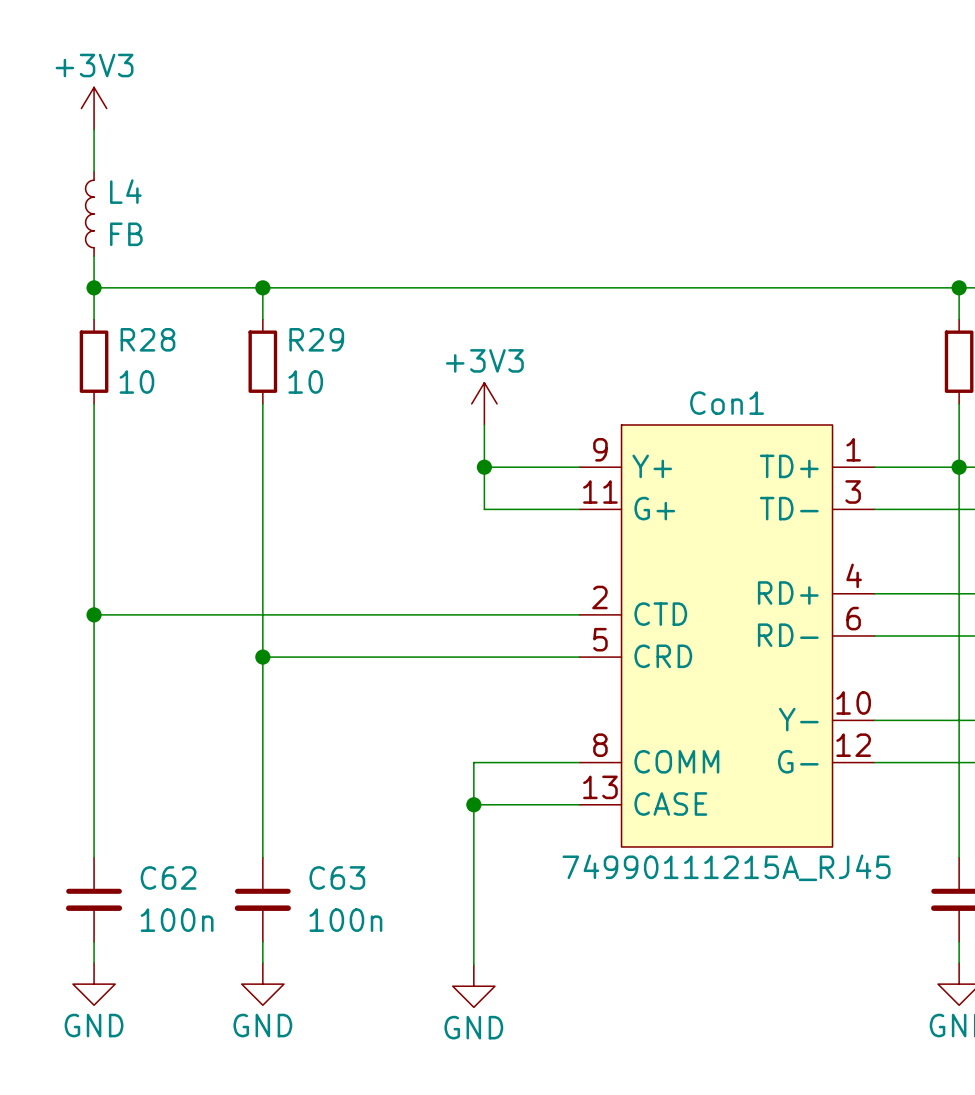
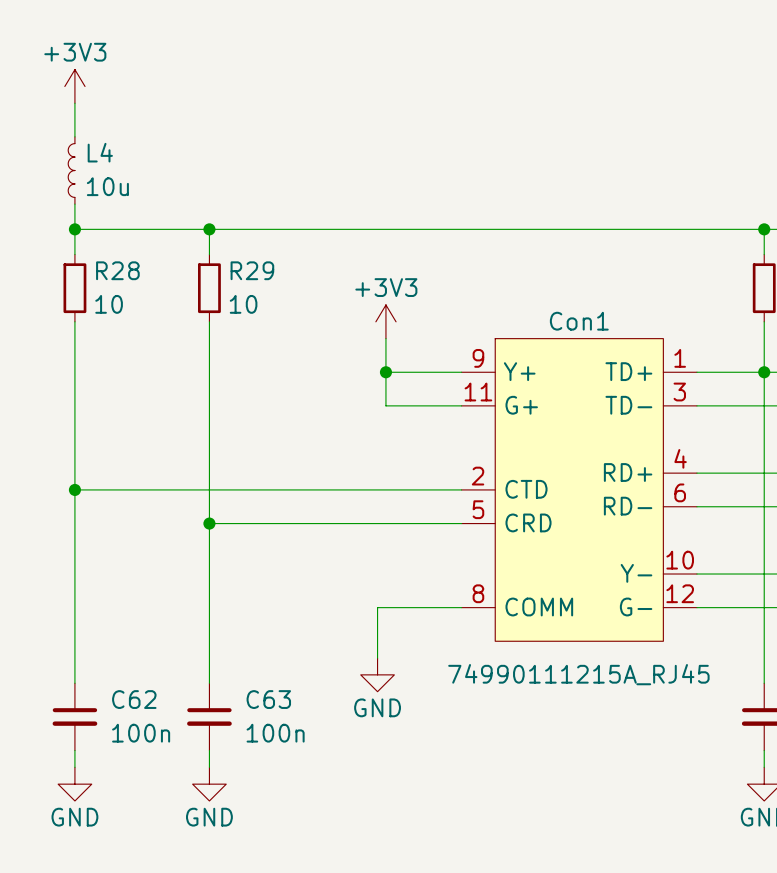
L4 value: FB (126, 234) -> 10u (107, 186)
Con1 symbol: [579, 424, 875, 847] -> [461, 338, 697, 642]
wire: (473, 804) (579, 804) -> none
junction: (473, 804) -> none
wire: (473, 825) (473, 965) -> none
power symbol position: GND (473, 986) -> GND (377, 674)

